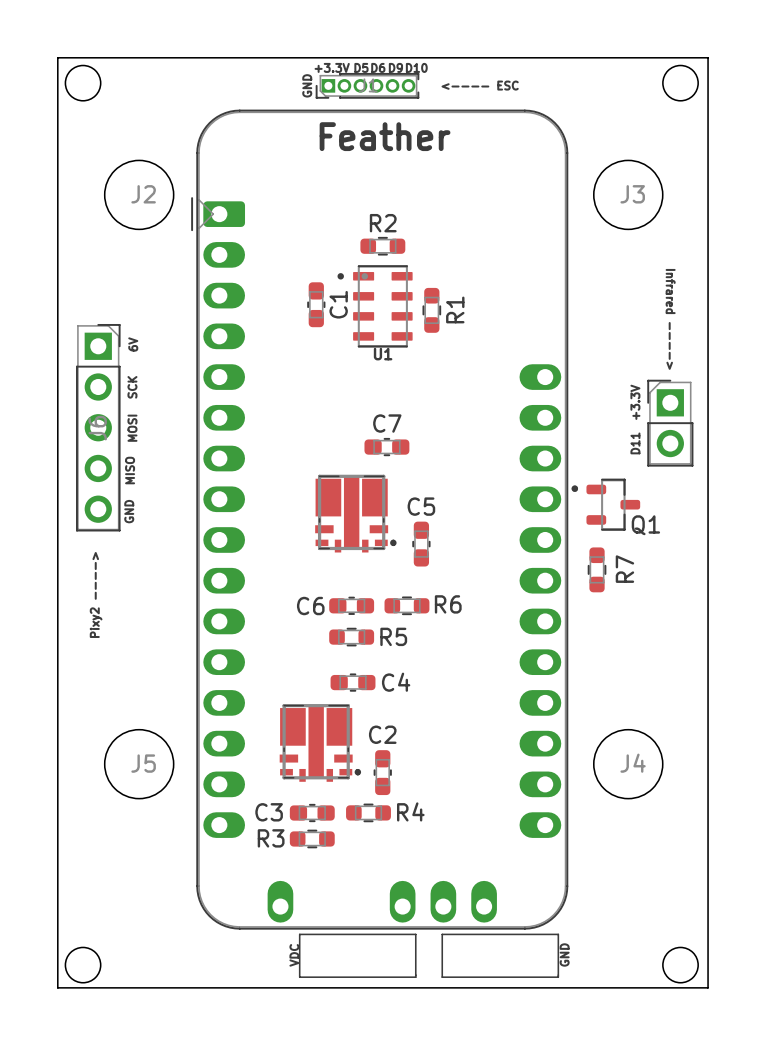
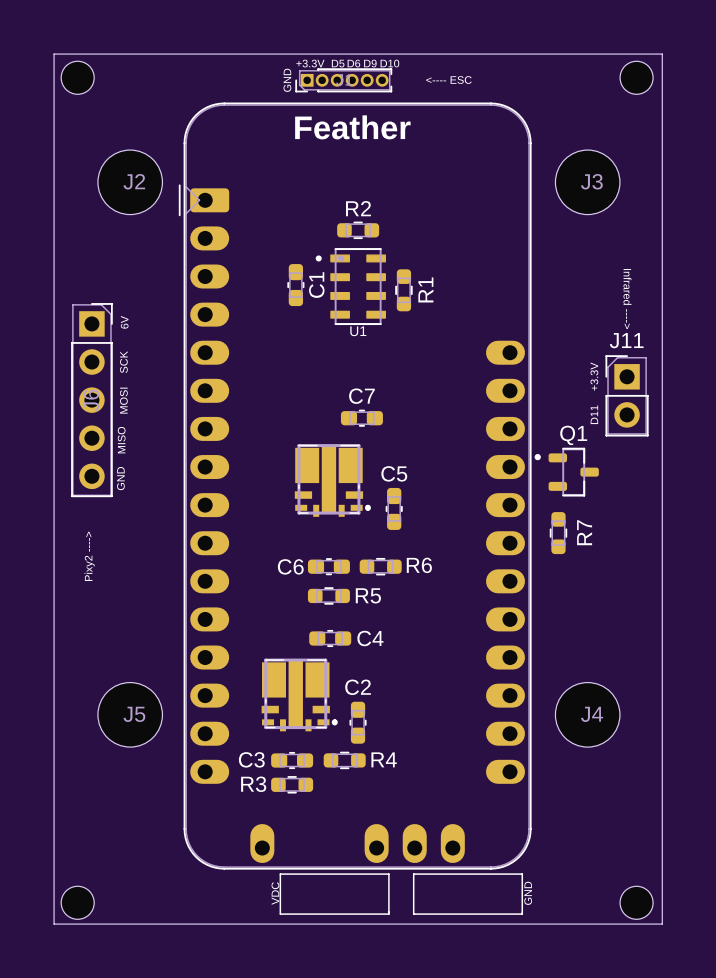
J11 name: none -> J11 (626, 340)
Q1 name position: Q1 (645, 525) -> Q1 (573, 435)

